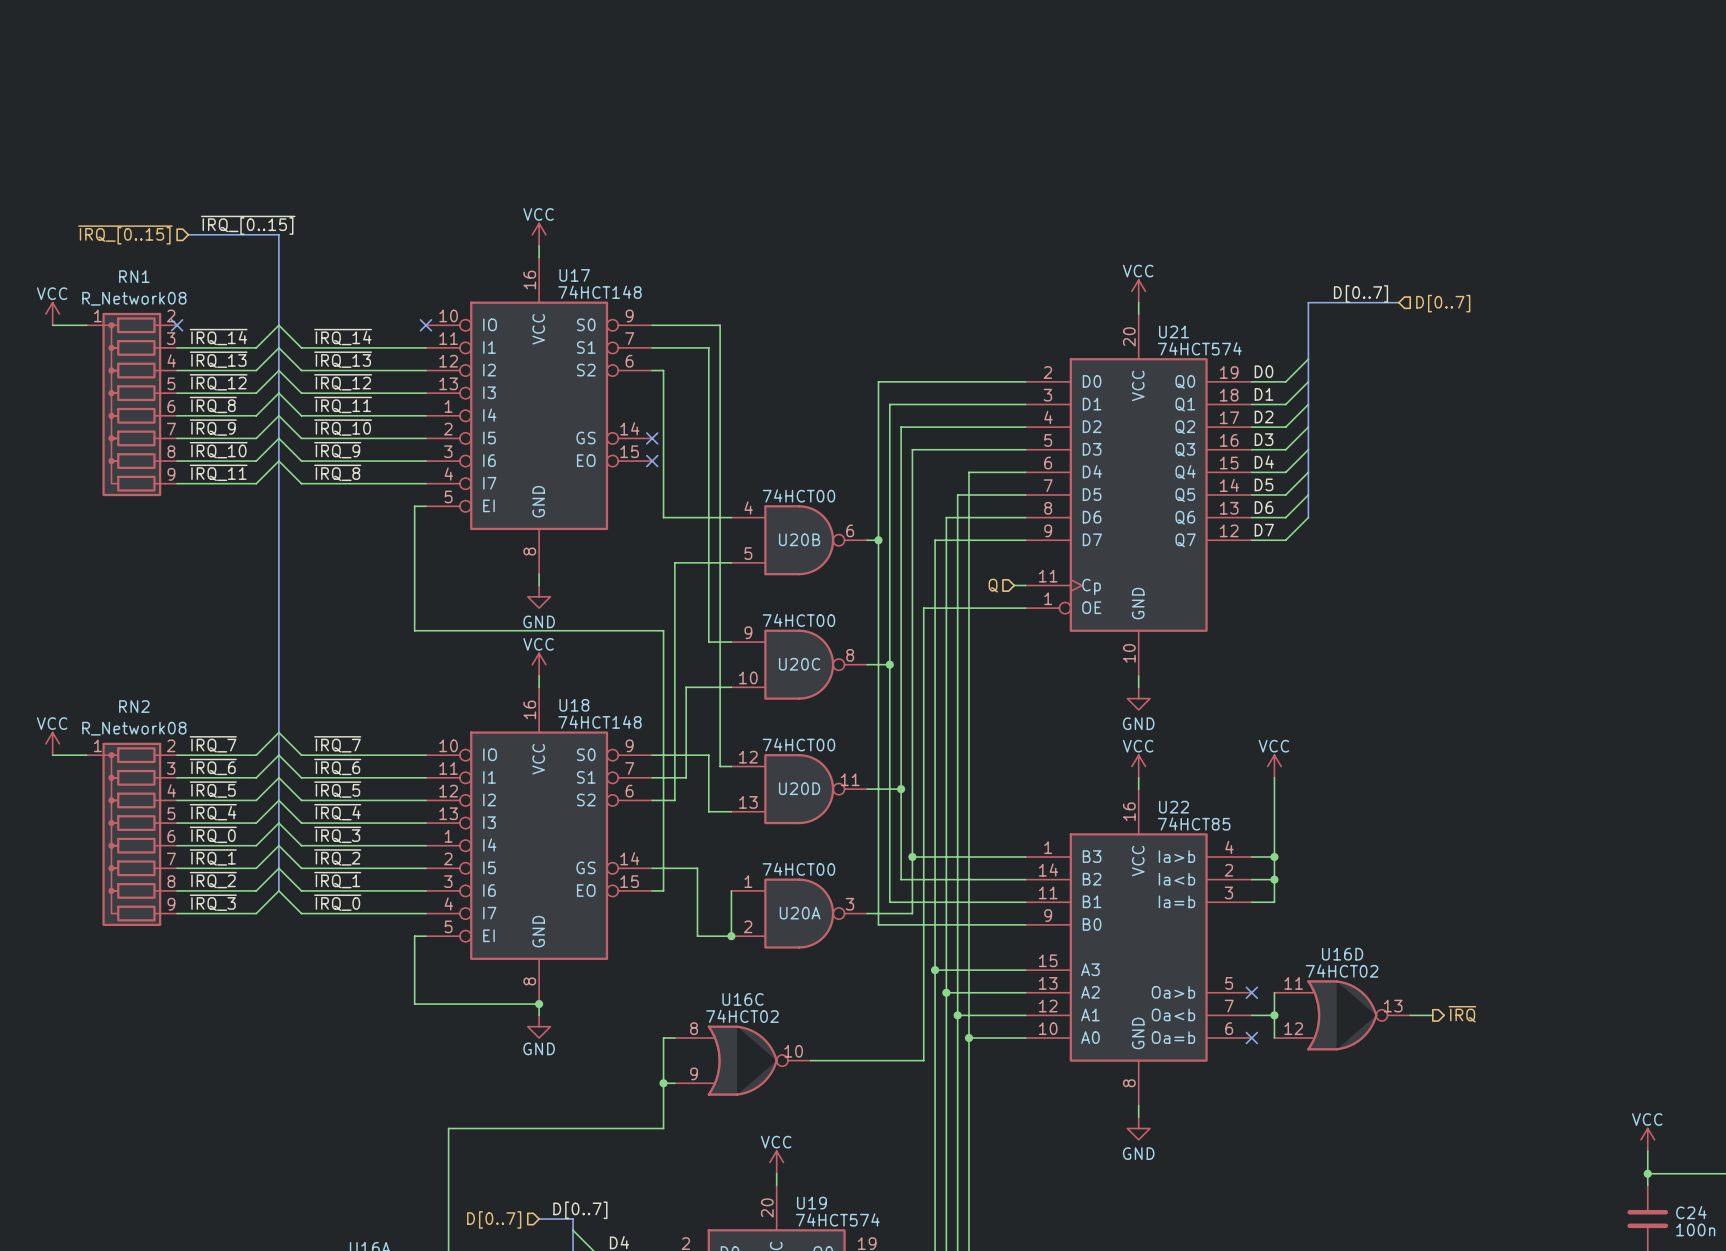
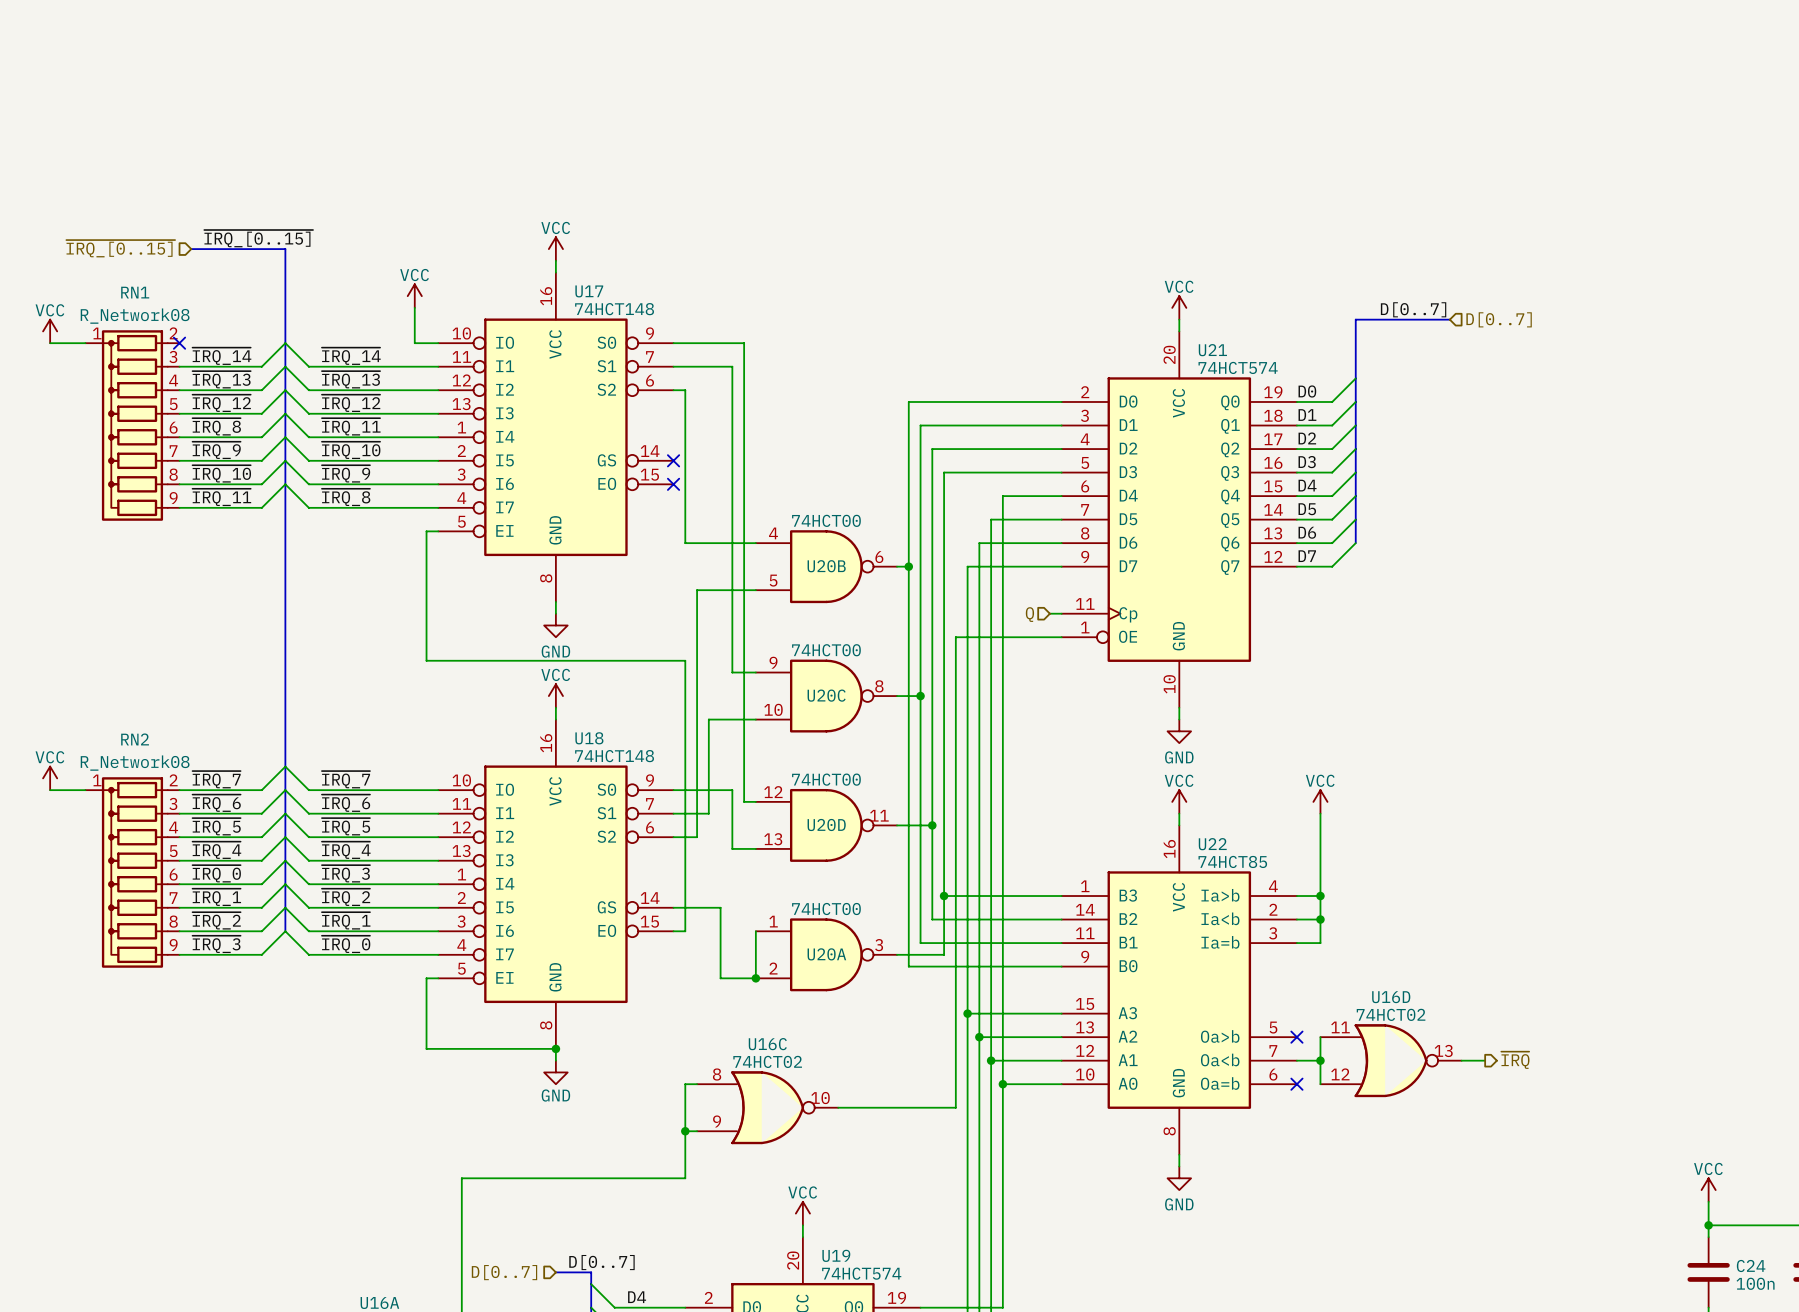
power symbol: none -> VCC (414, 296)
wire: none -> (414, 307) (414, 343) (438, 343)
no-connect mark: (425, 325) -> none

